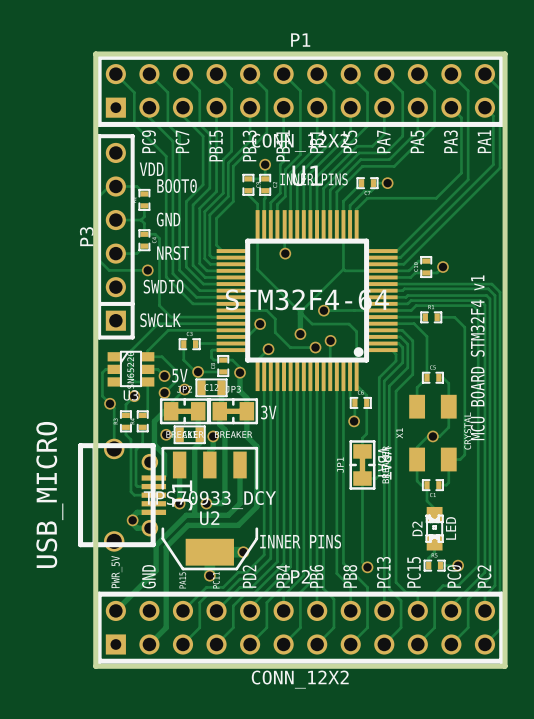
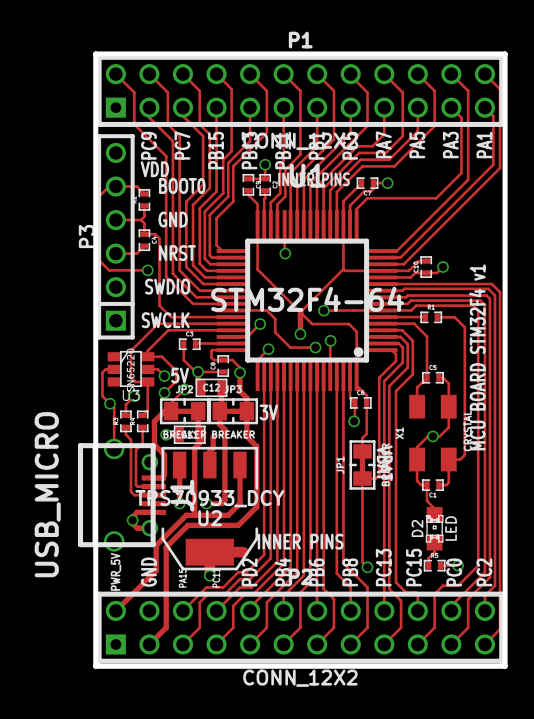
via: (213, 436) -> none
via: (243, 552) -> none

